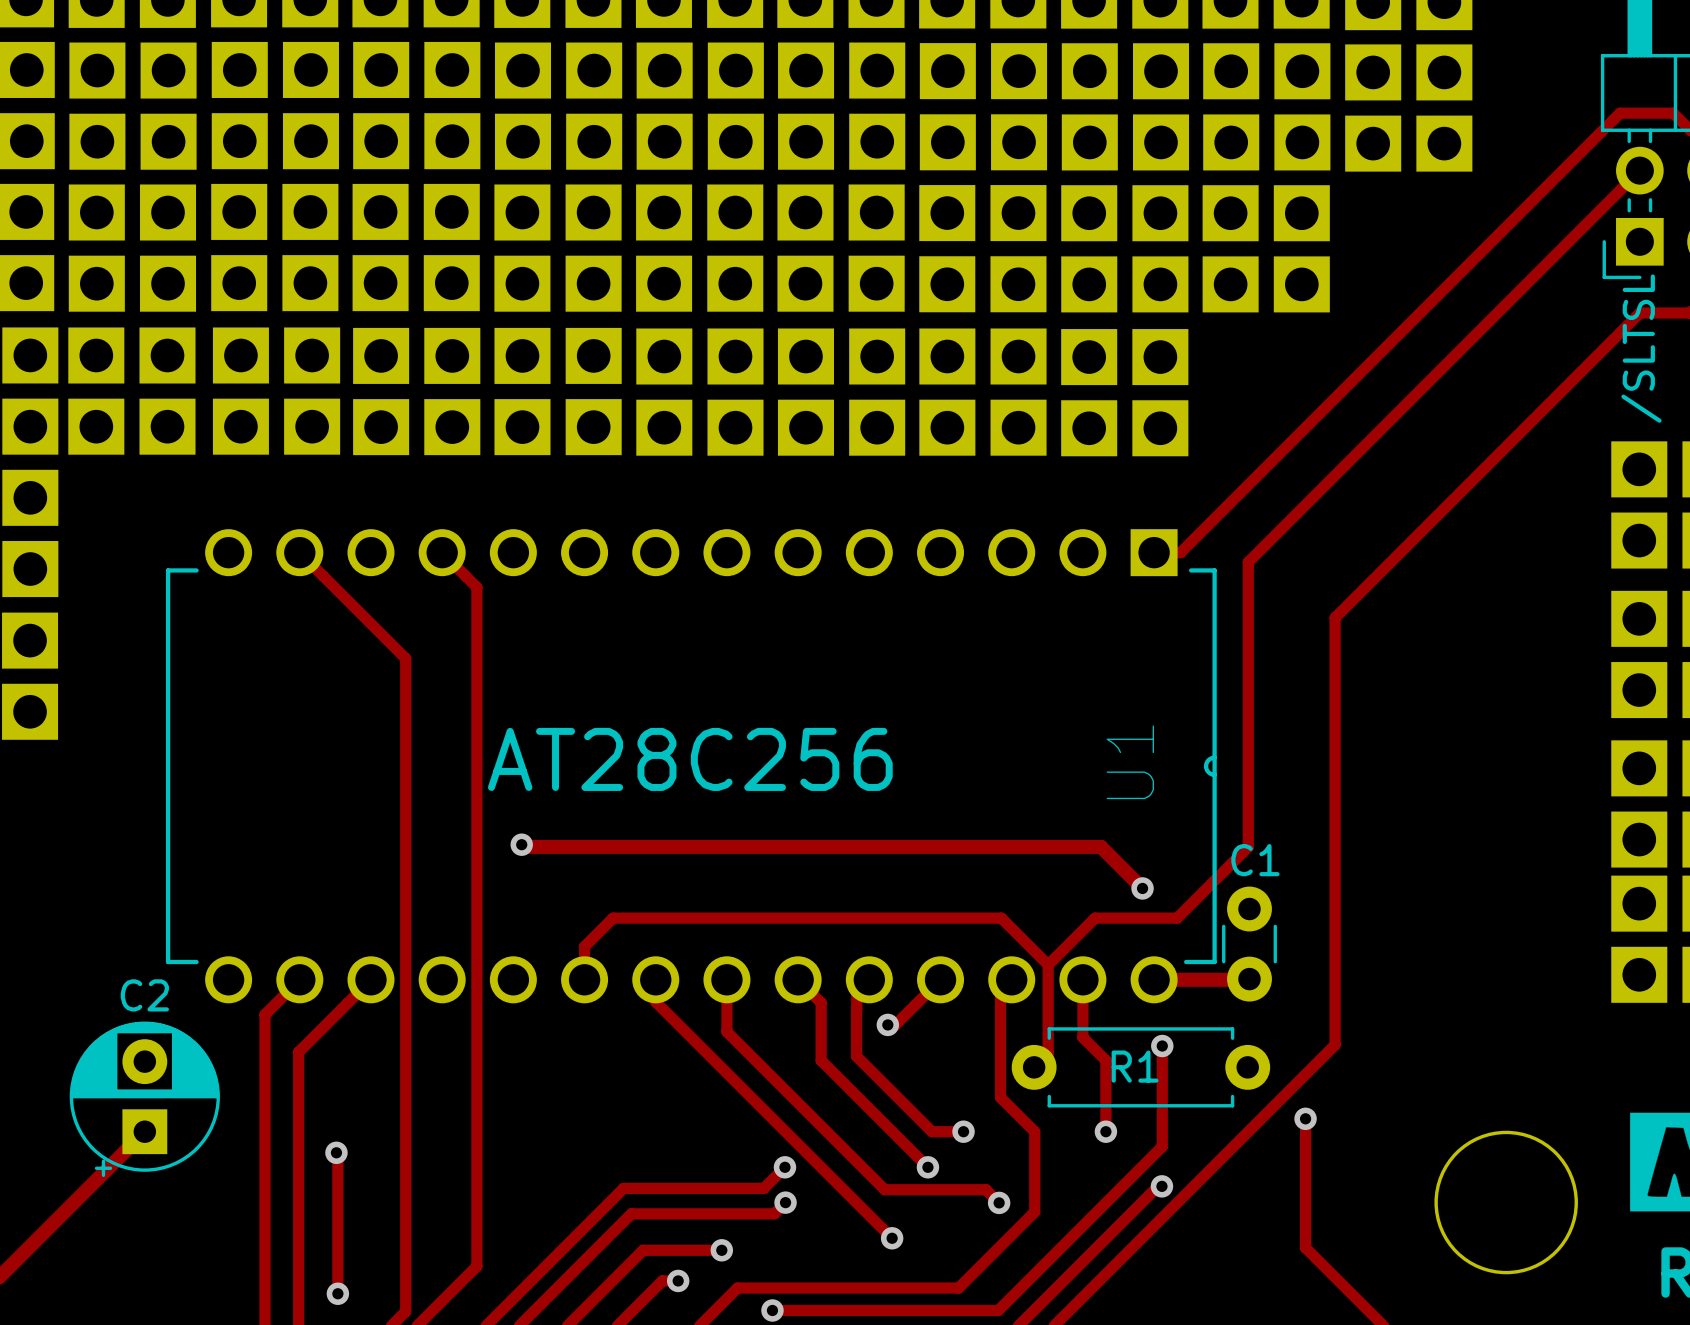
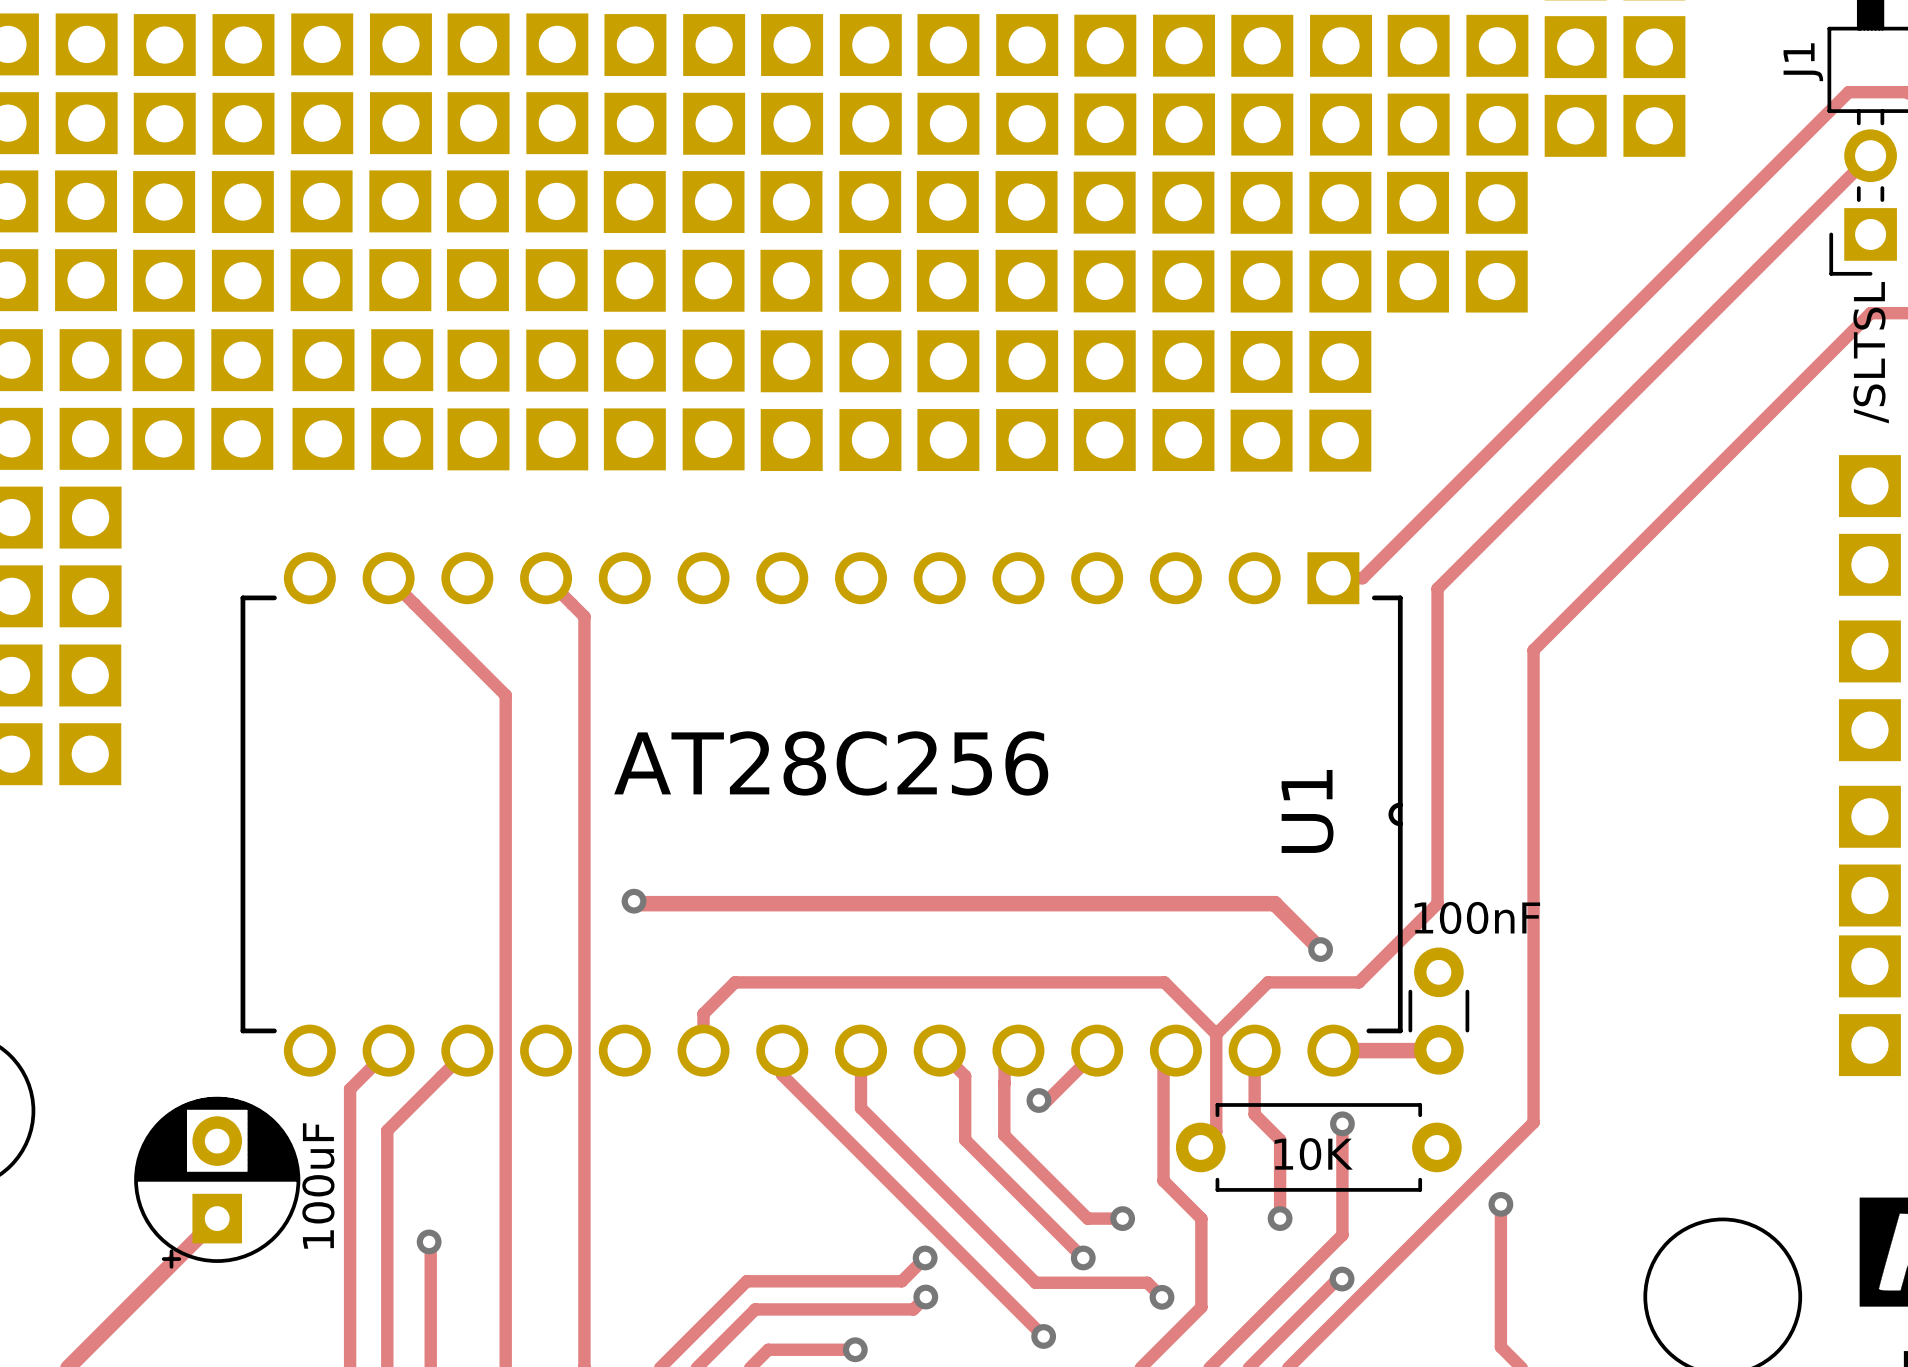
J1 name: none -> J1 (1803, 62)
text position: AT28C256 (690, 759) -> AT28C256 (831, 763)
C1 value: none -> 100nF (1477, 917)
C1 name: C1 (1255, 860) -> none
C2 name: C2 (144, 995) -> none
R1 name: R1 (1135, 1066) -> none
R1 value: none -> 10K (1313, 1154)
C2 value: none -> 100uF (318, 1186)

